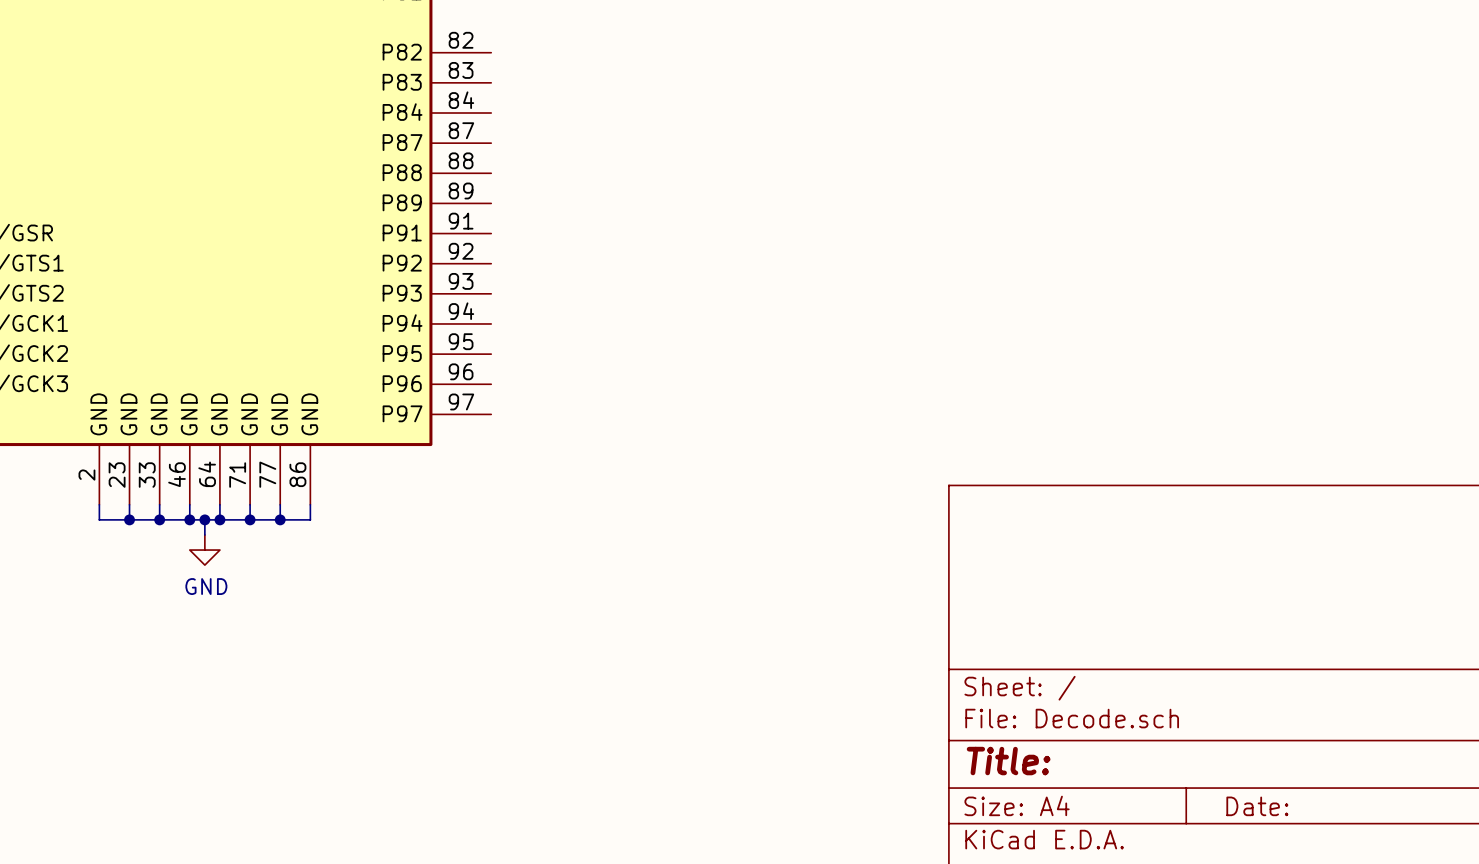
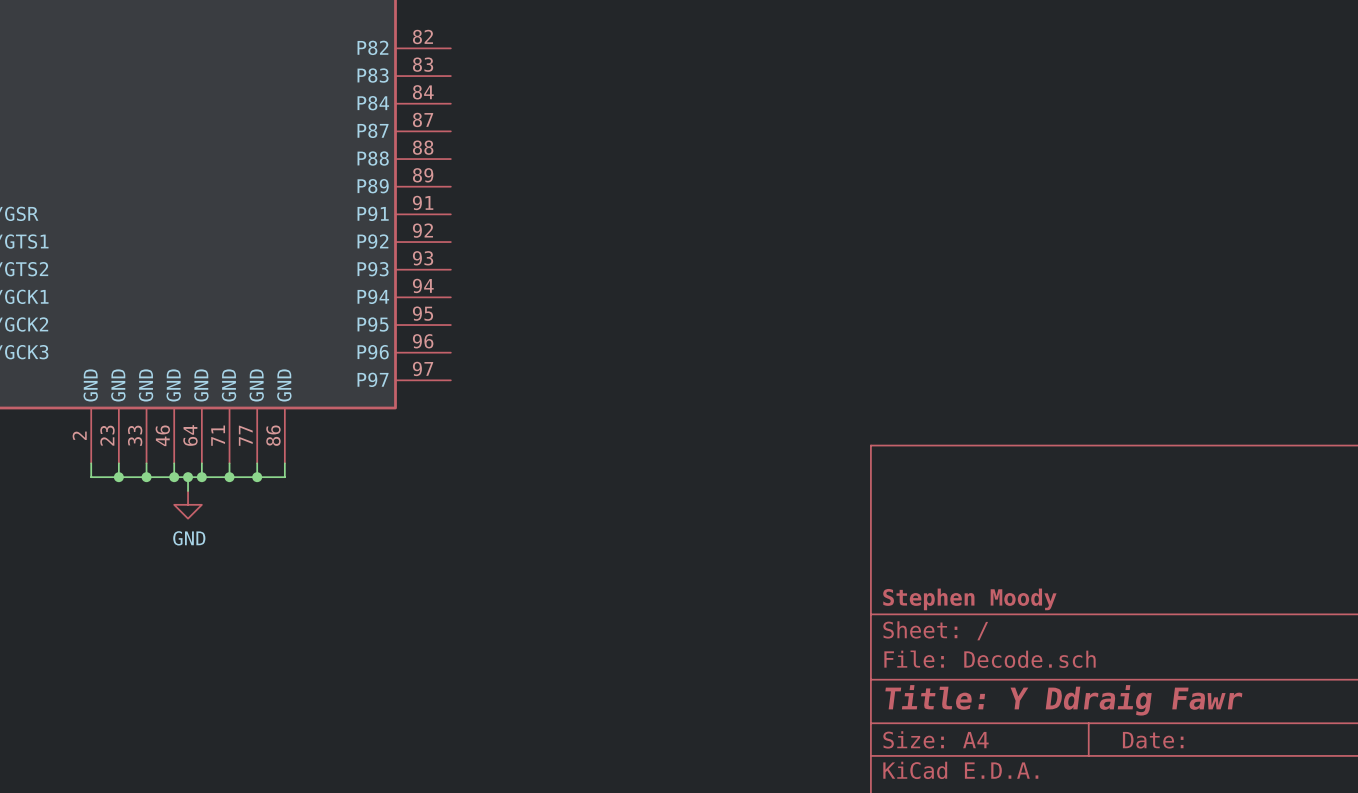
title block: none -> Stephen Moody (969, 599)
title block: Title: (1008, 761) -> Title: Y Ddraig Fawr (1063, 700)

